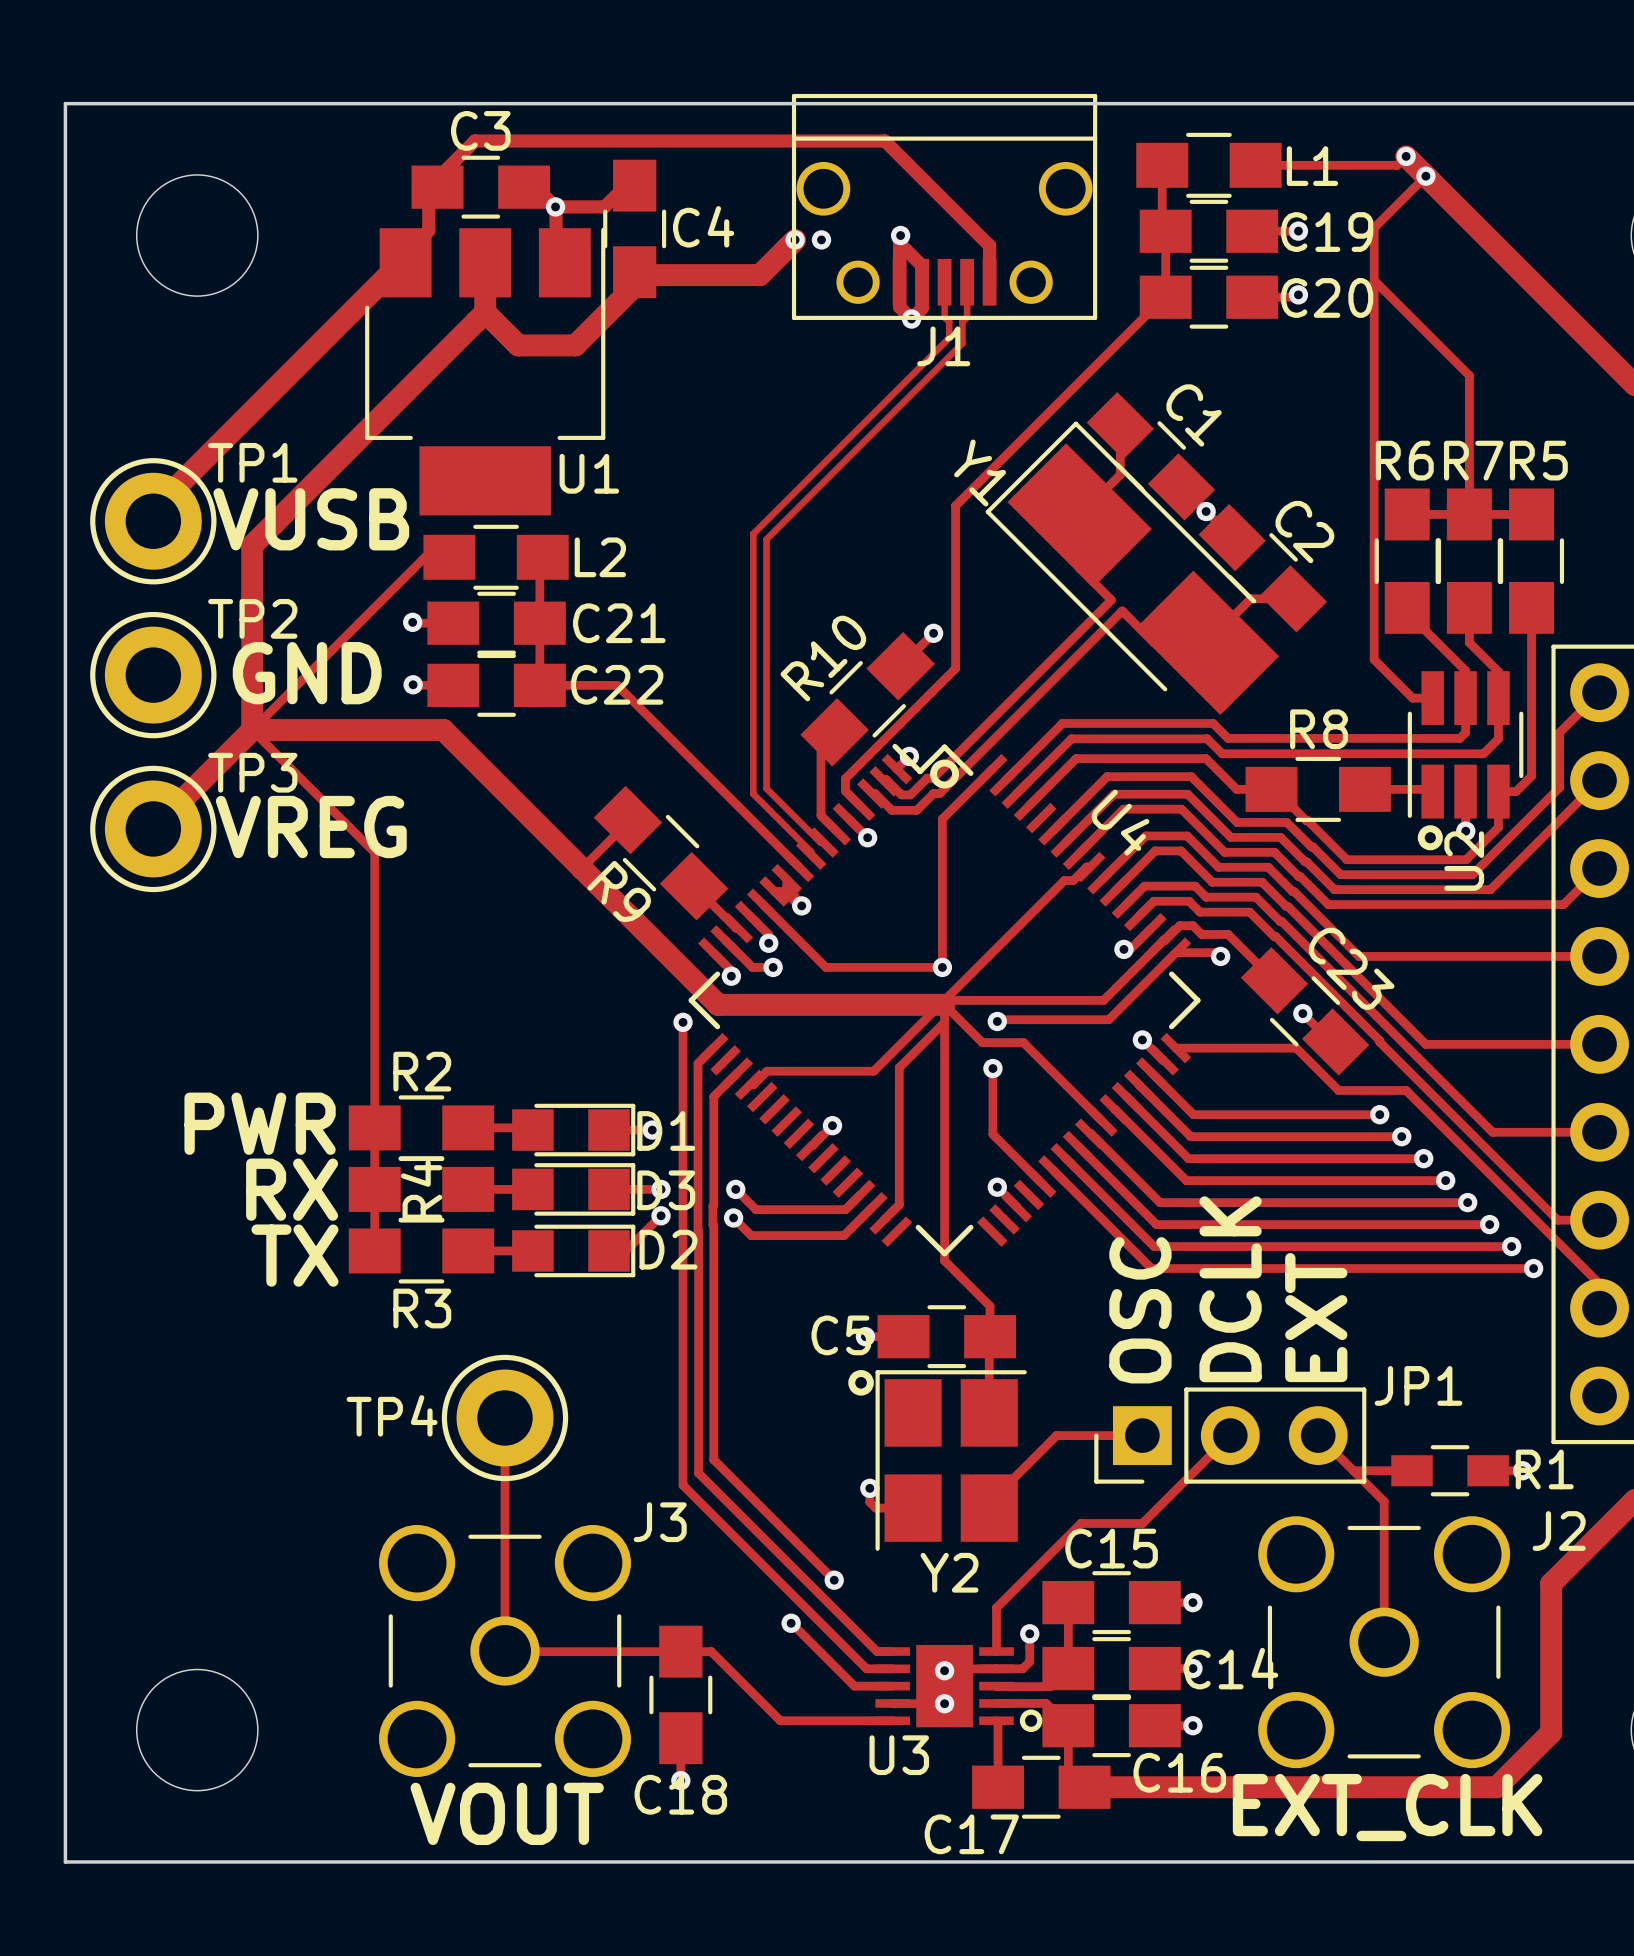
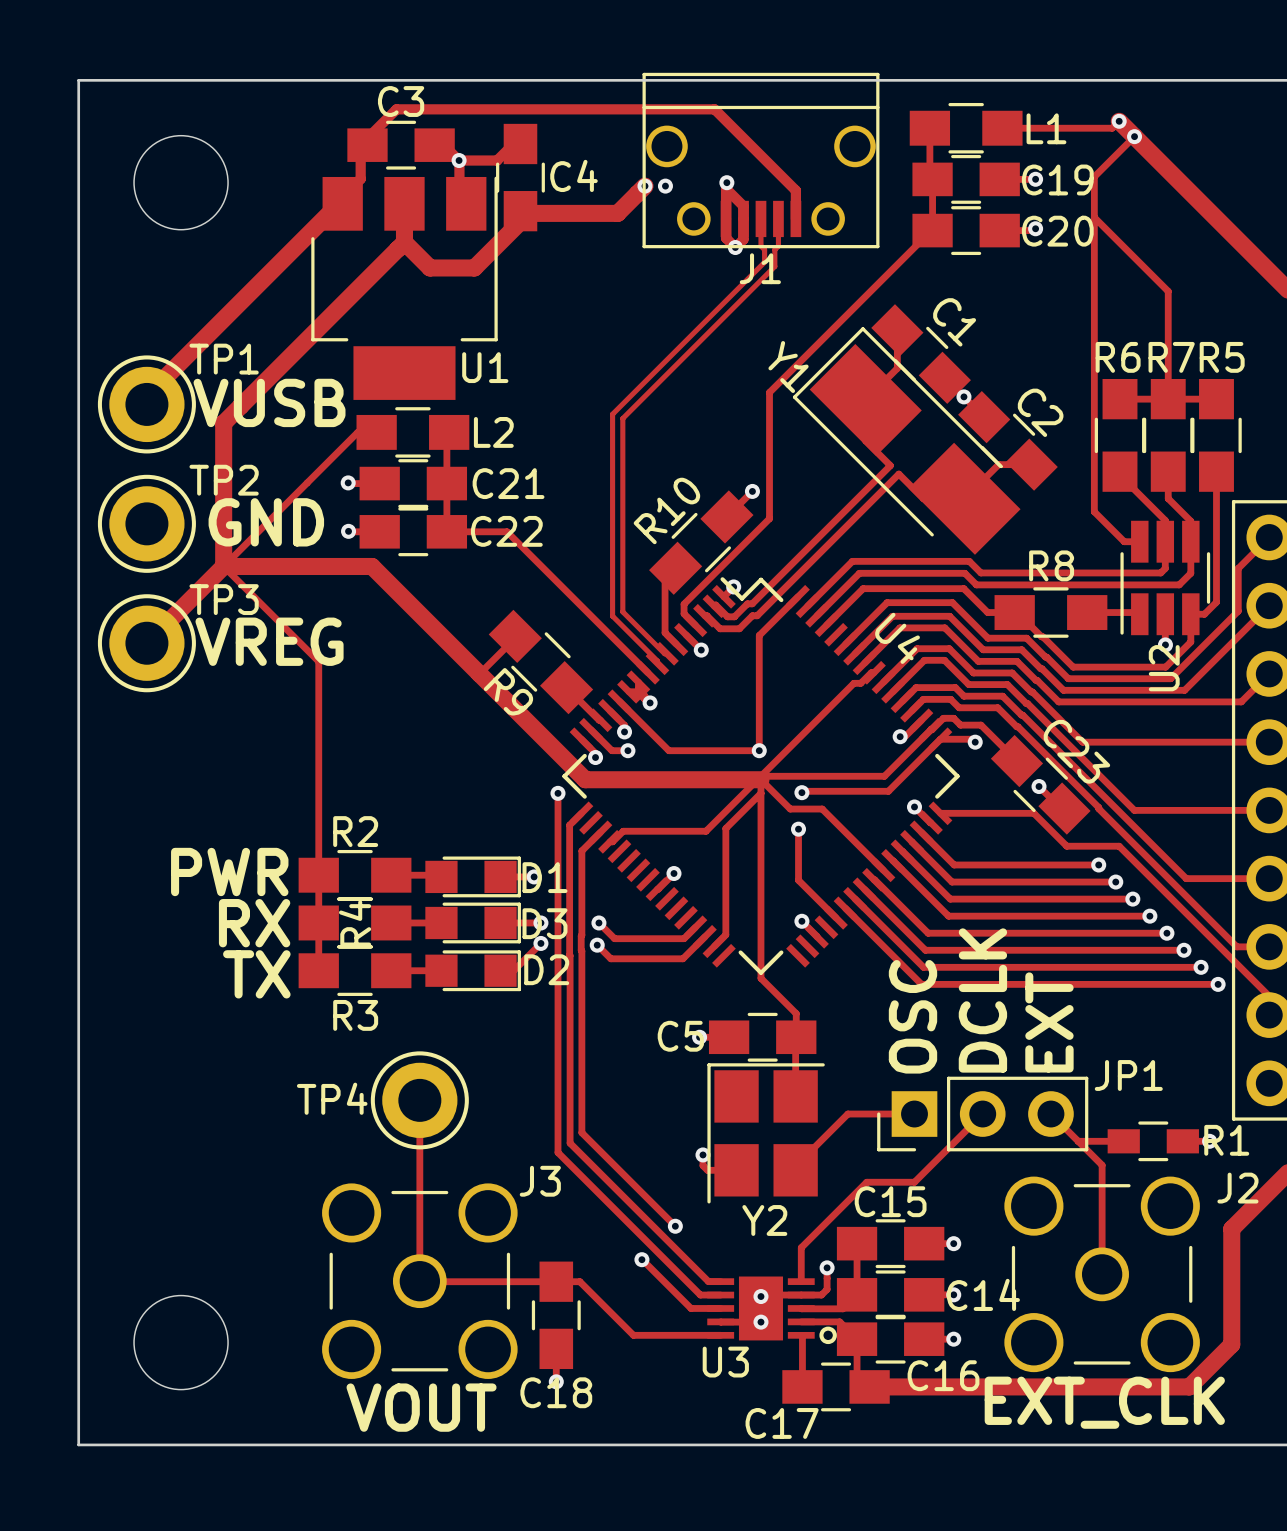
drawing: [930, 759, 960, 789] -> none
drawing: [1417, 825, 1443, 851] -> none
drawing: [848, 1370, 874, 1396] -> none

